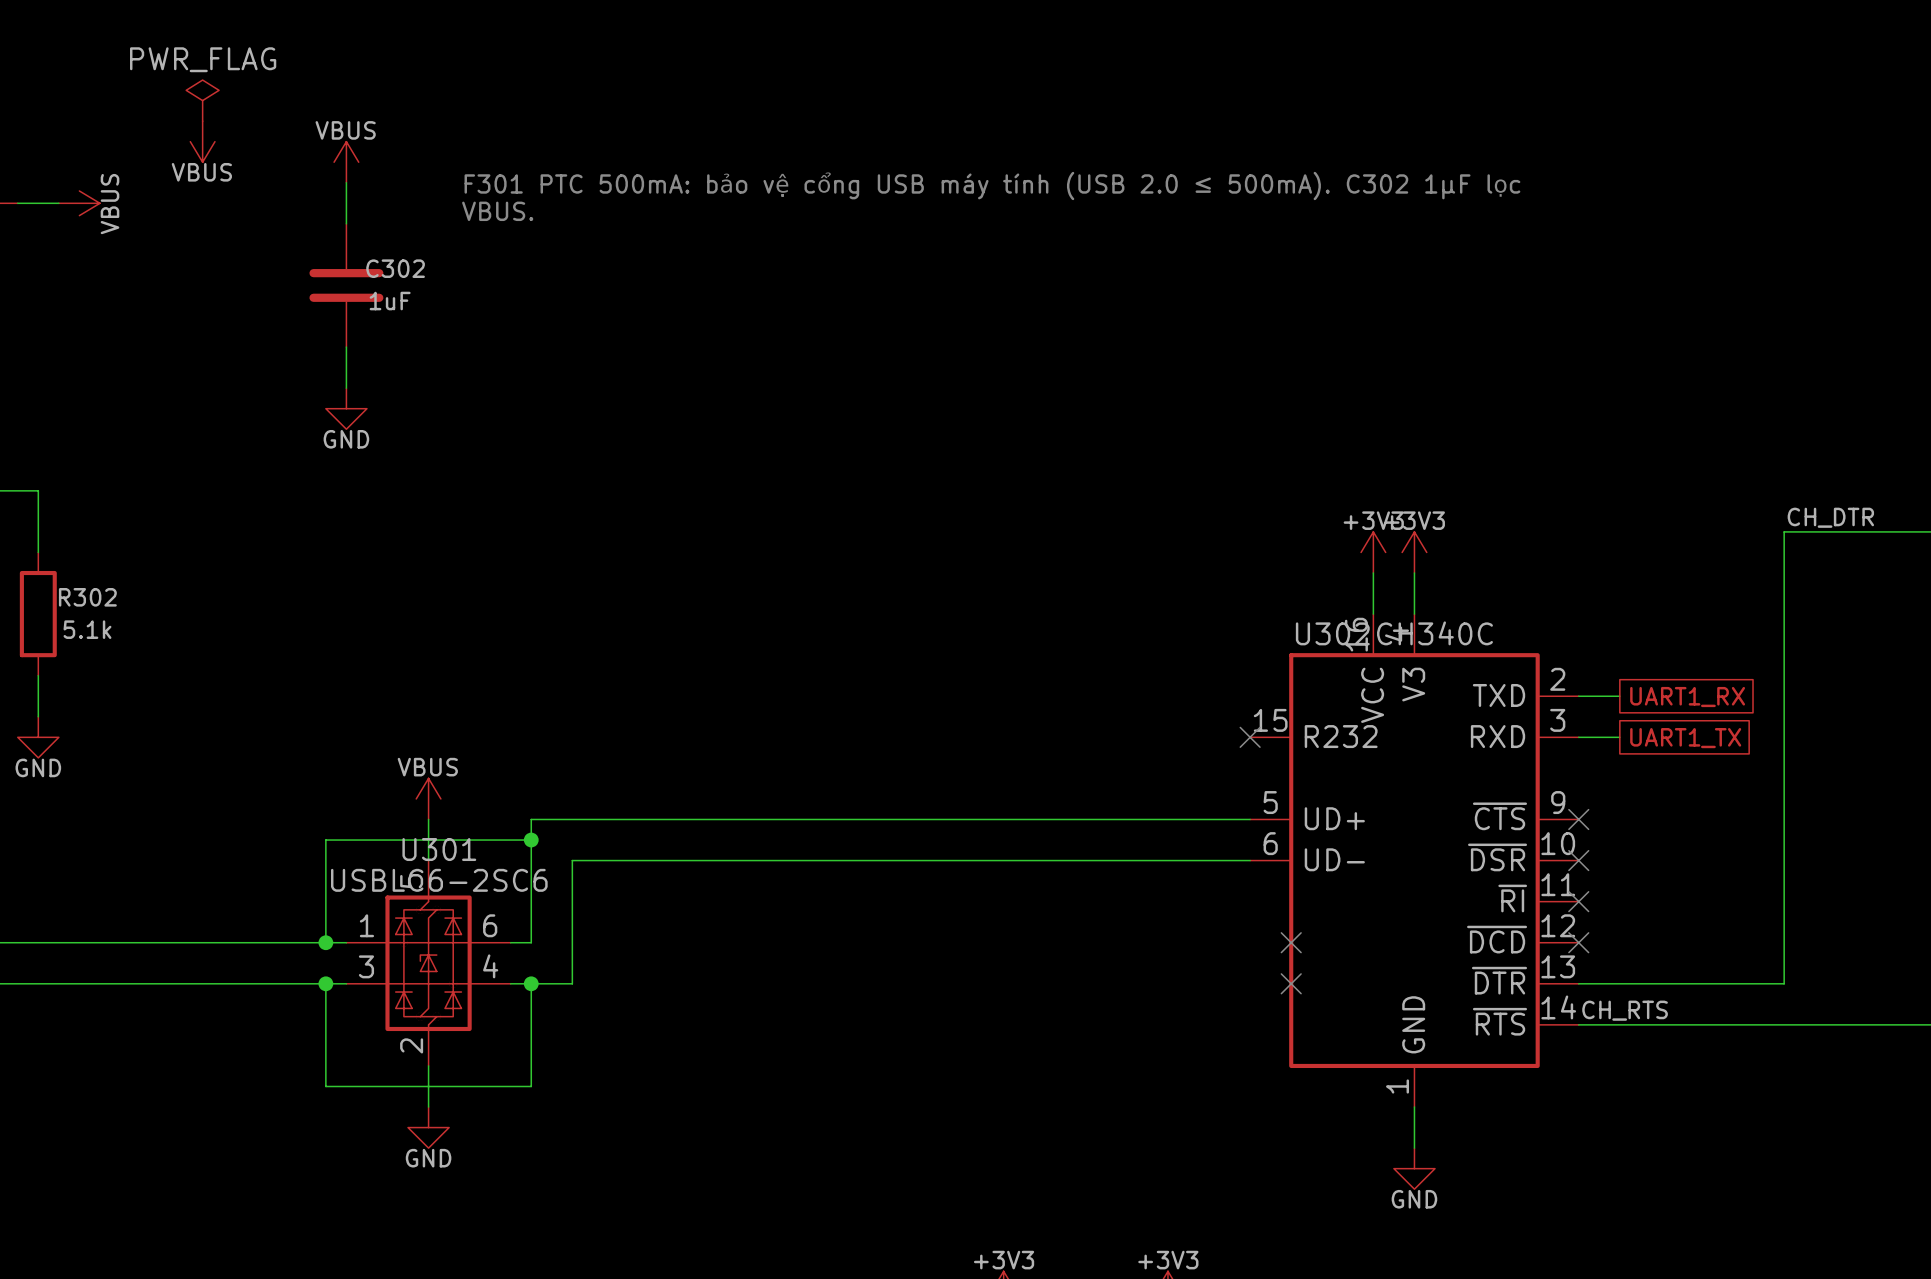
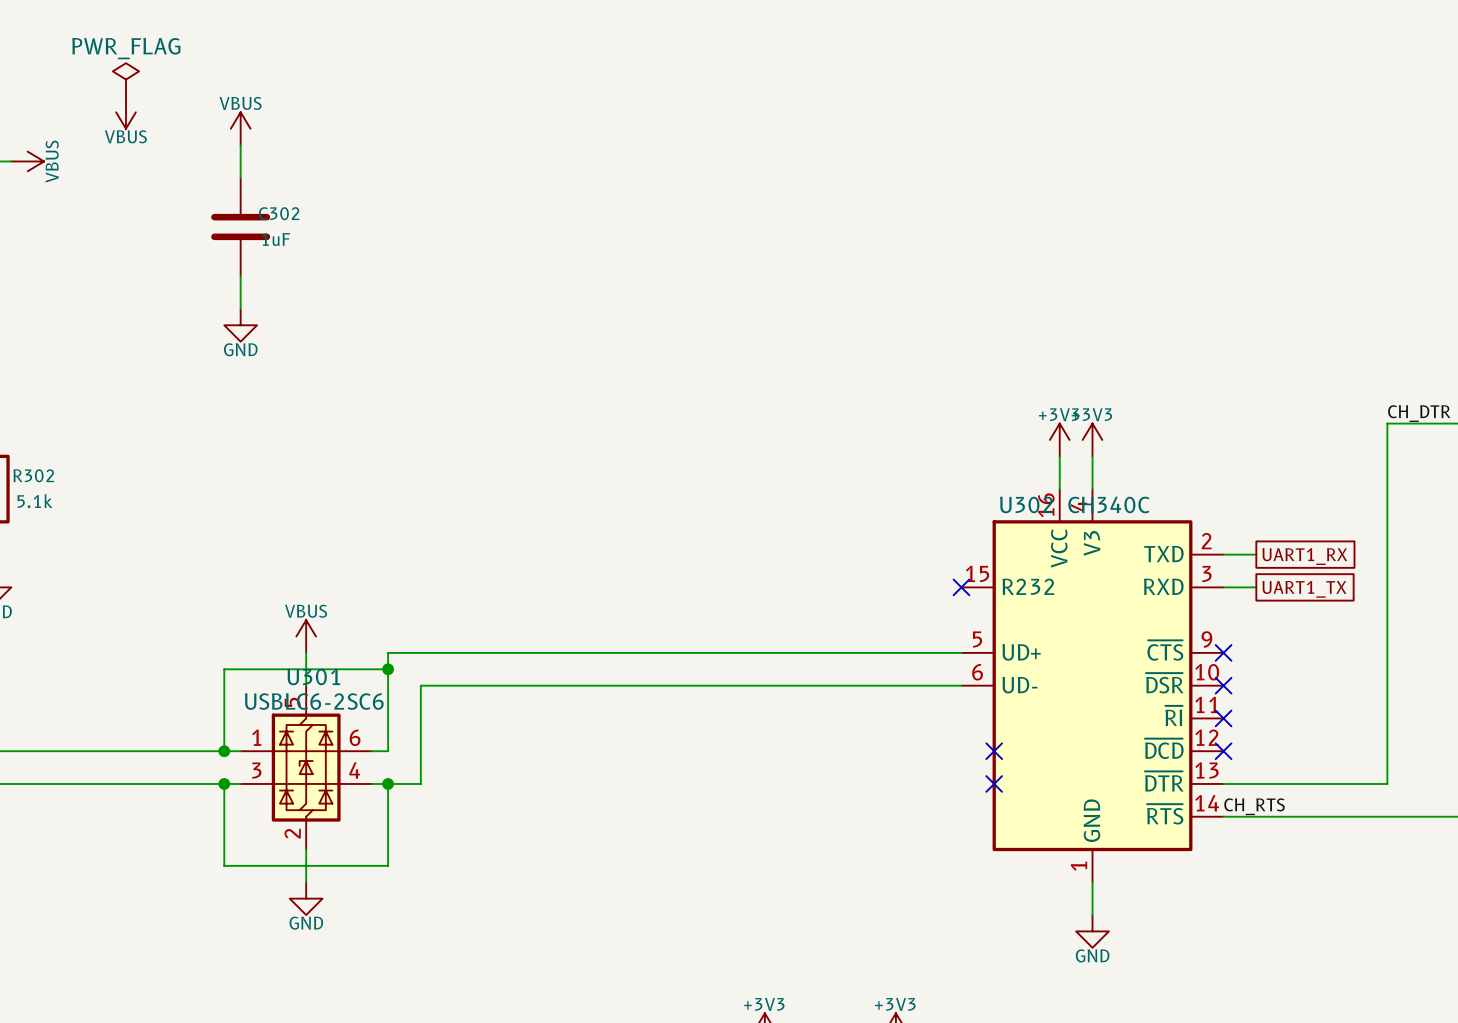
text: F301 PTC 500mA: bảo vệ cổng USB máy tính (USB 2.0 ≤ 500mA). C302 1µF lọc (992, 185) -> none
text: VBUS. (497, 211) -> none

